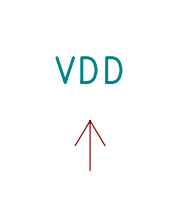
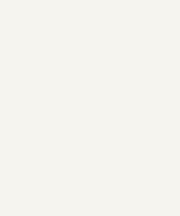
power symbol: VDD (90, 145) -> none

